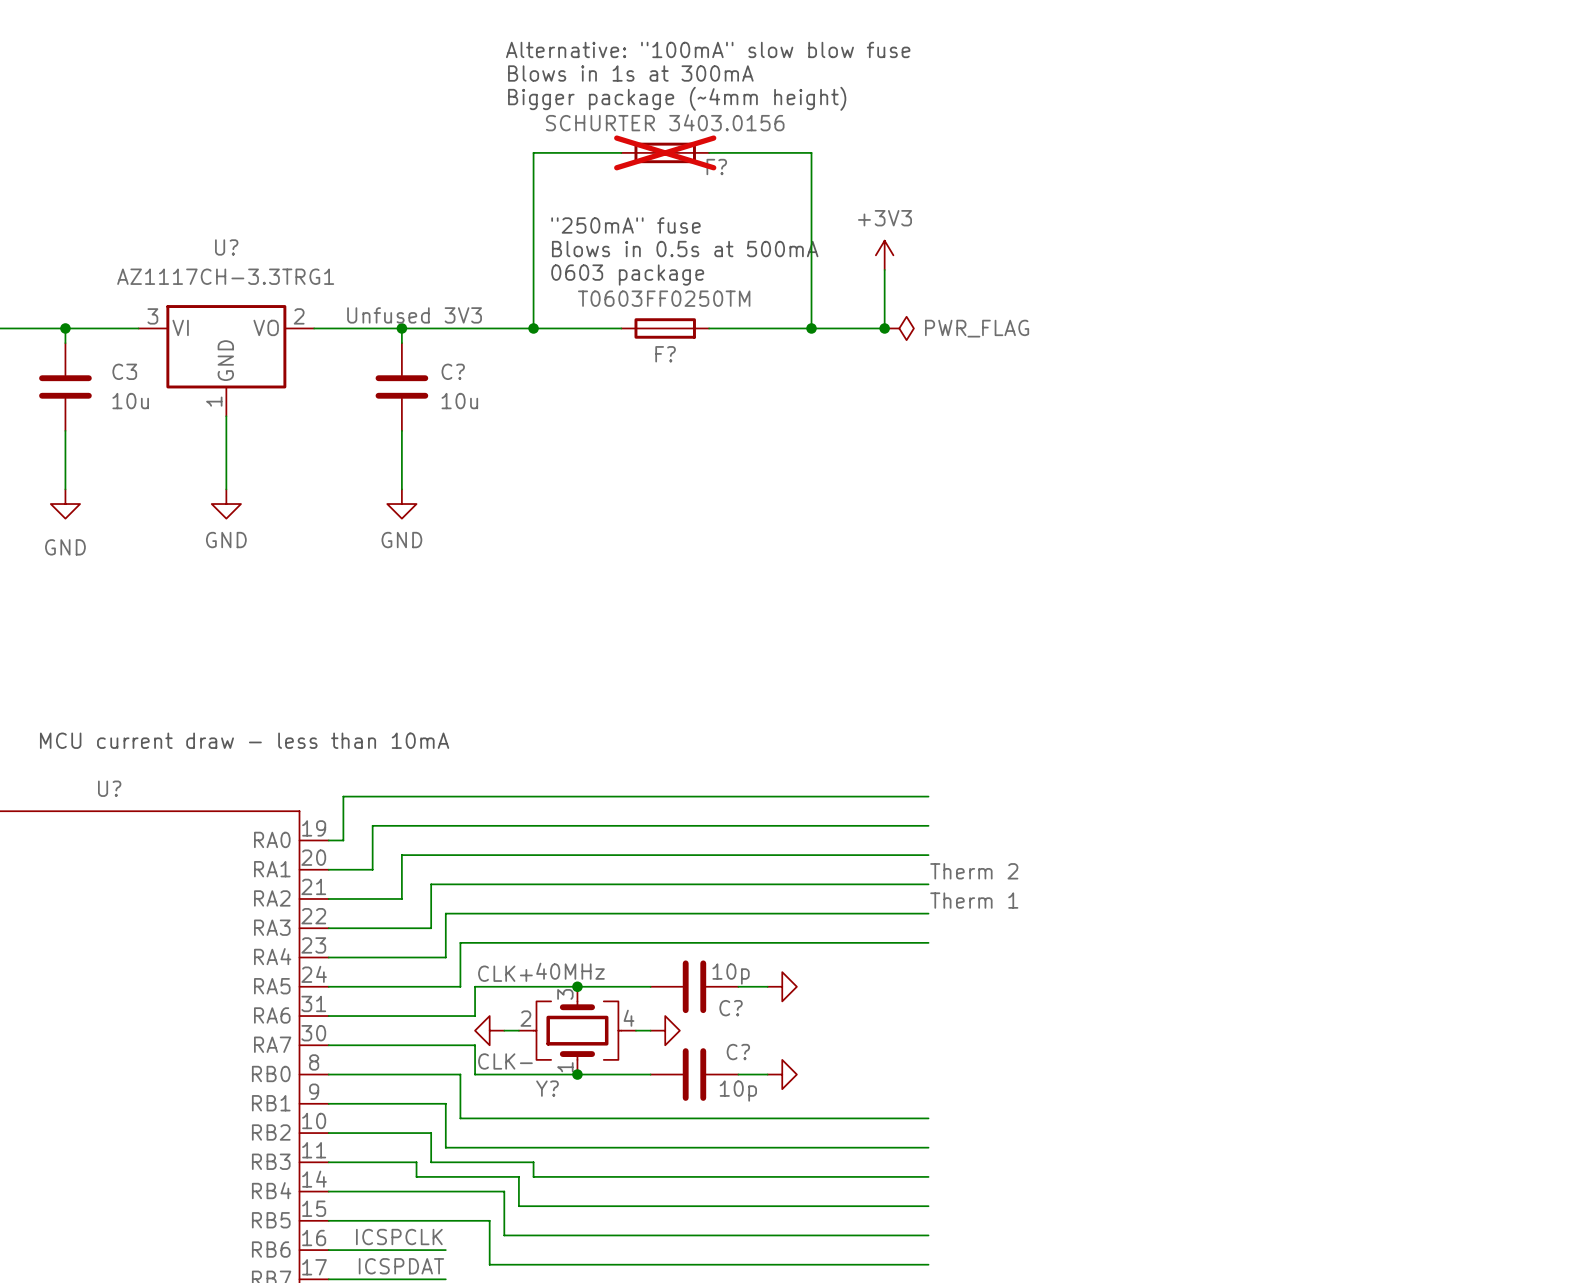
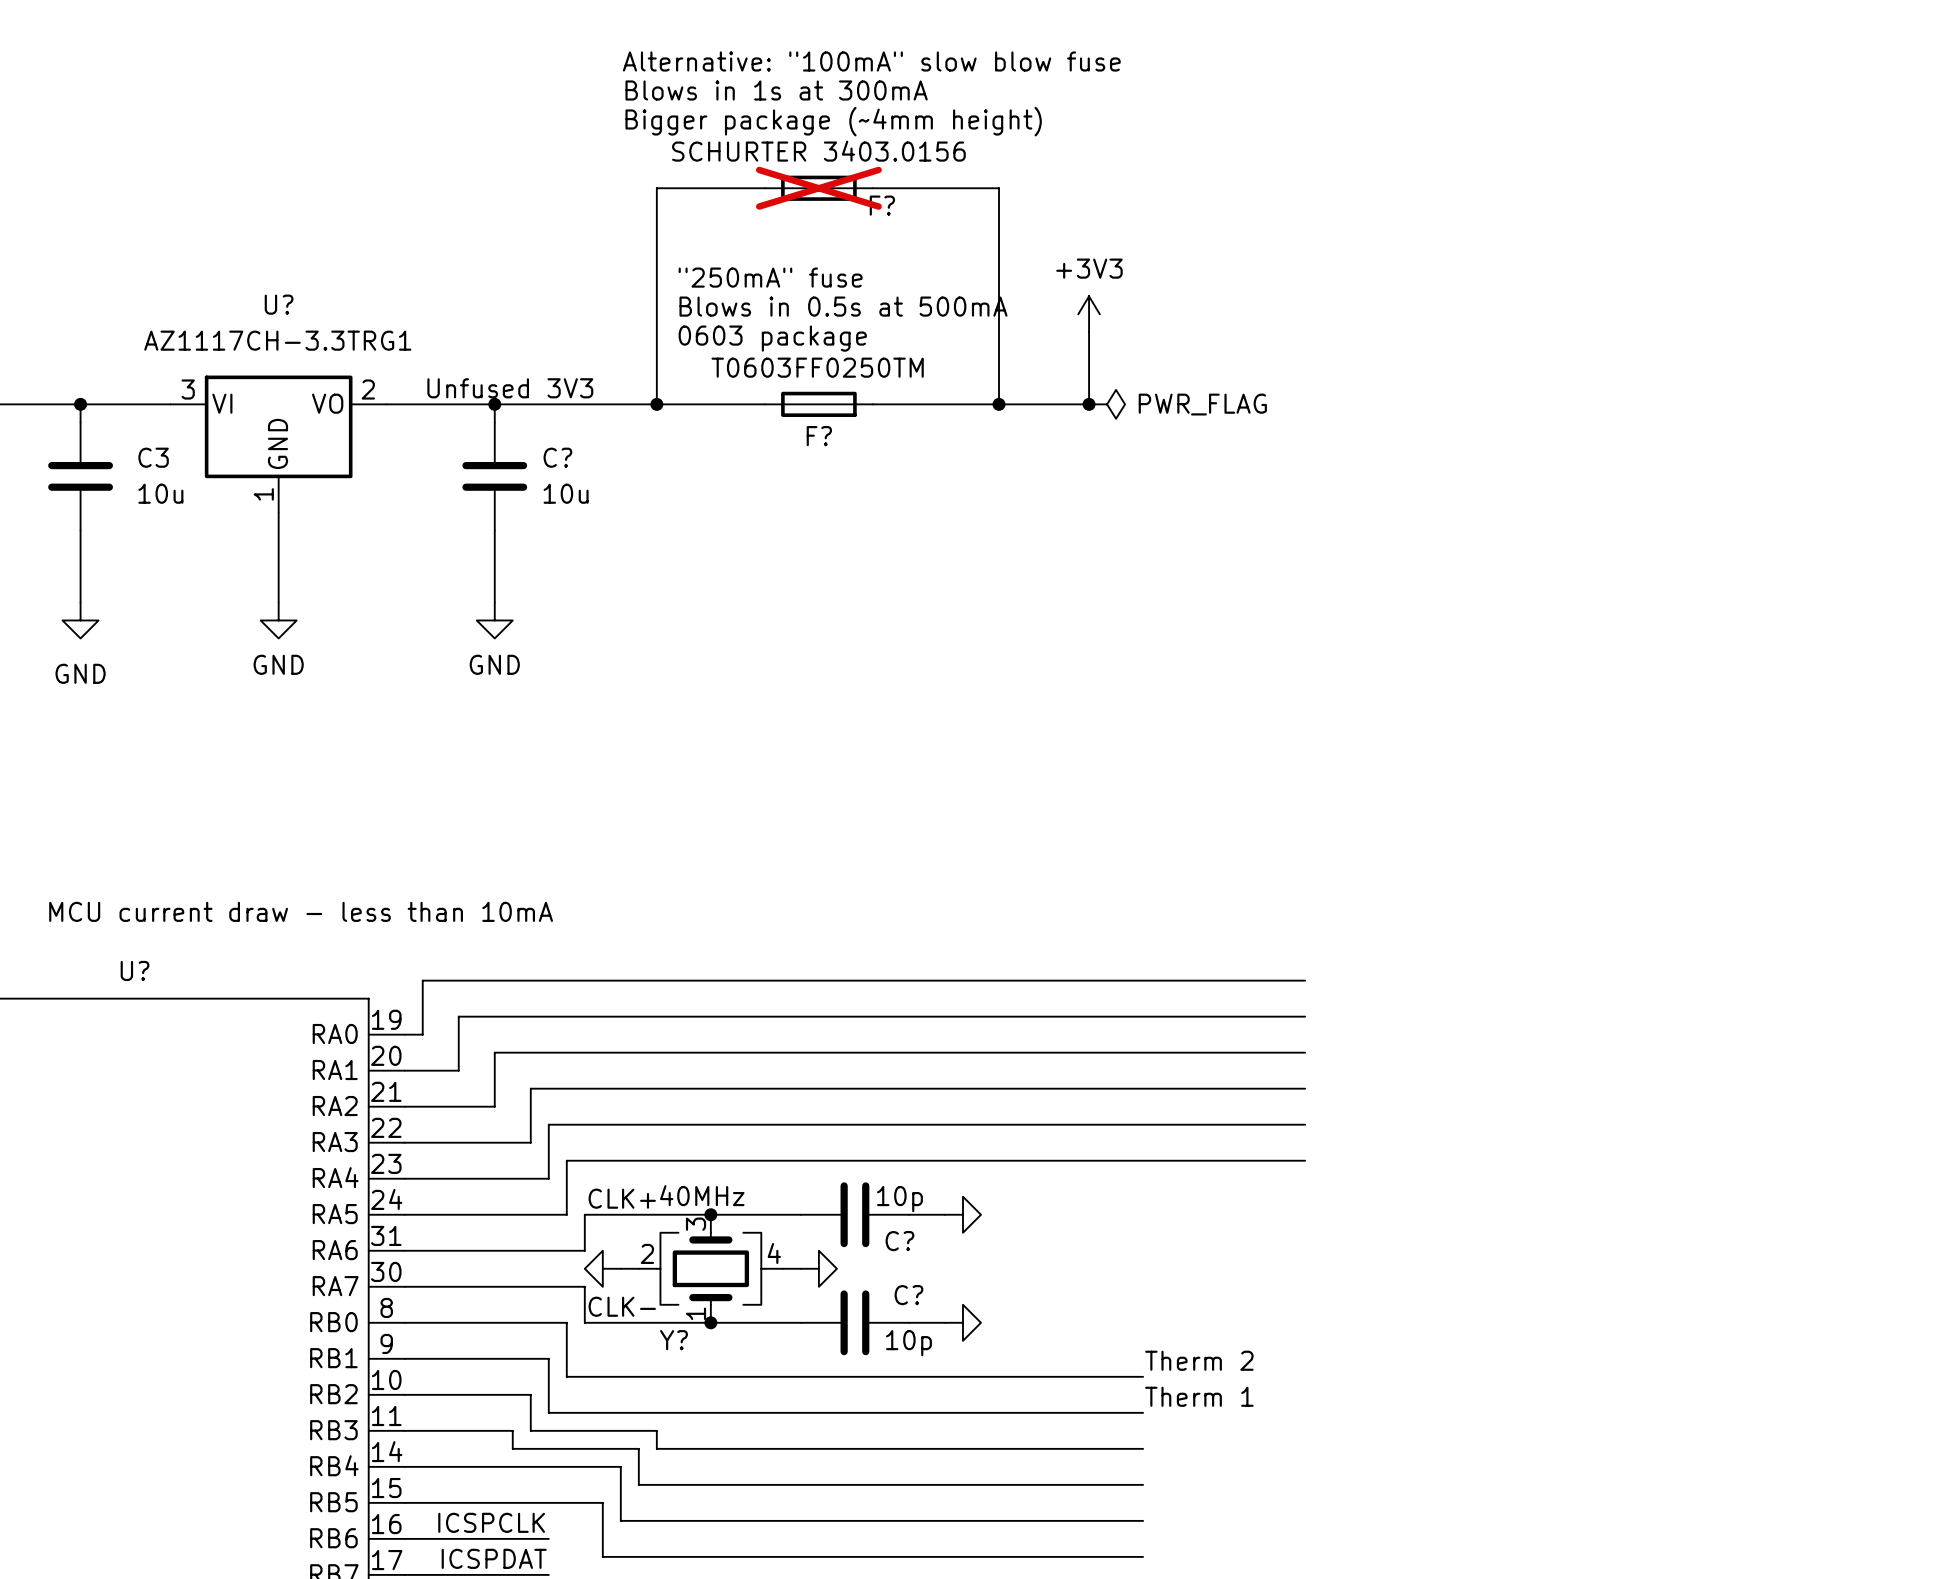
wire: none -> (1143, 980) (1305, 980)
wire: none -> (1143, 1016) (1305, 1016)
wire: none -> (1143, 1052) (1305, 1052)
label position: Therm 2 (974, 871) -> Therm 2 (1199, 1360)
wire: none -> (1143, 1088) (1305, 1088)
label position: Therm 1 (974, 900) -> Therm 1 (1199, 1396)
wire: none -> (1143, 1124) (1305, 1124)
wire: none -> (1143, 1160) (1305, 1160)

